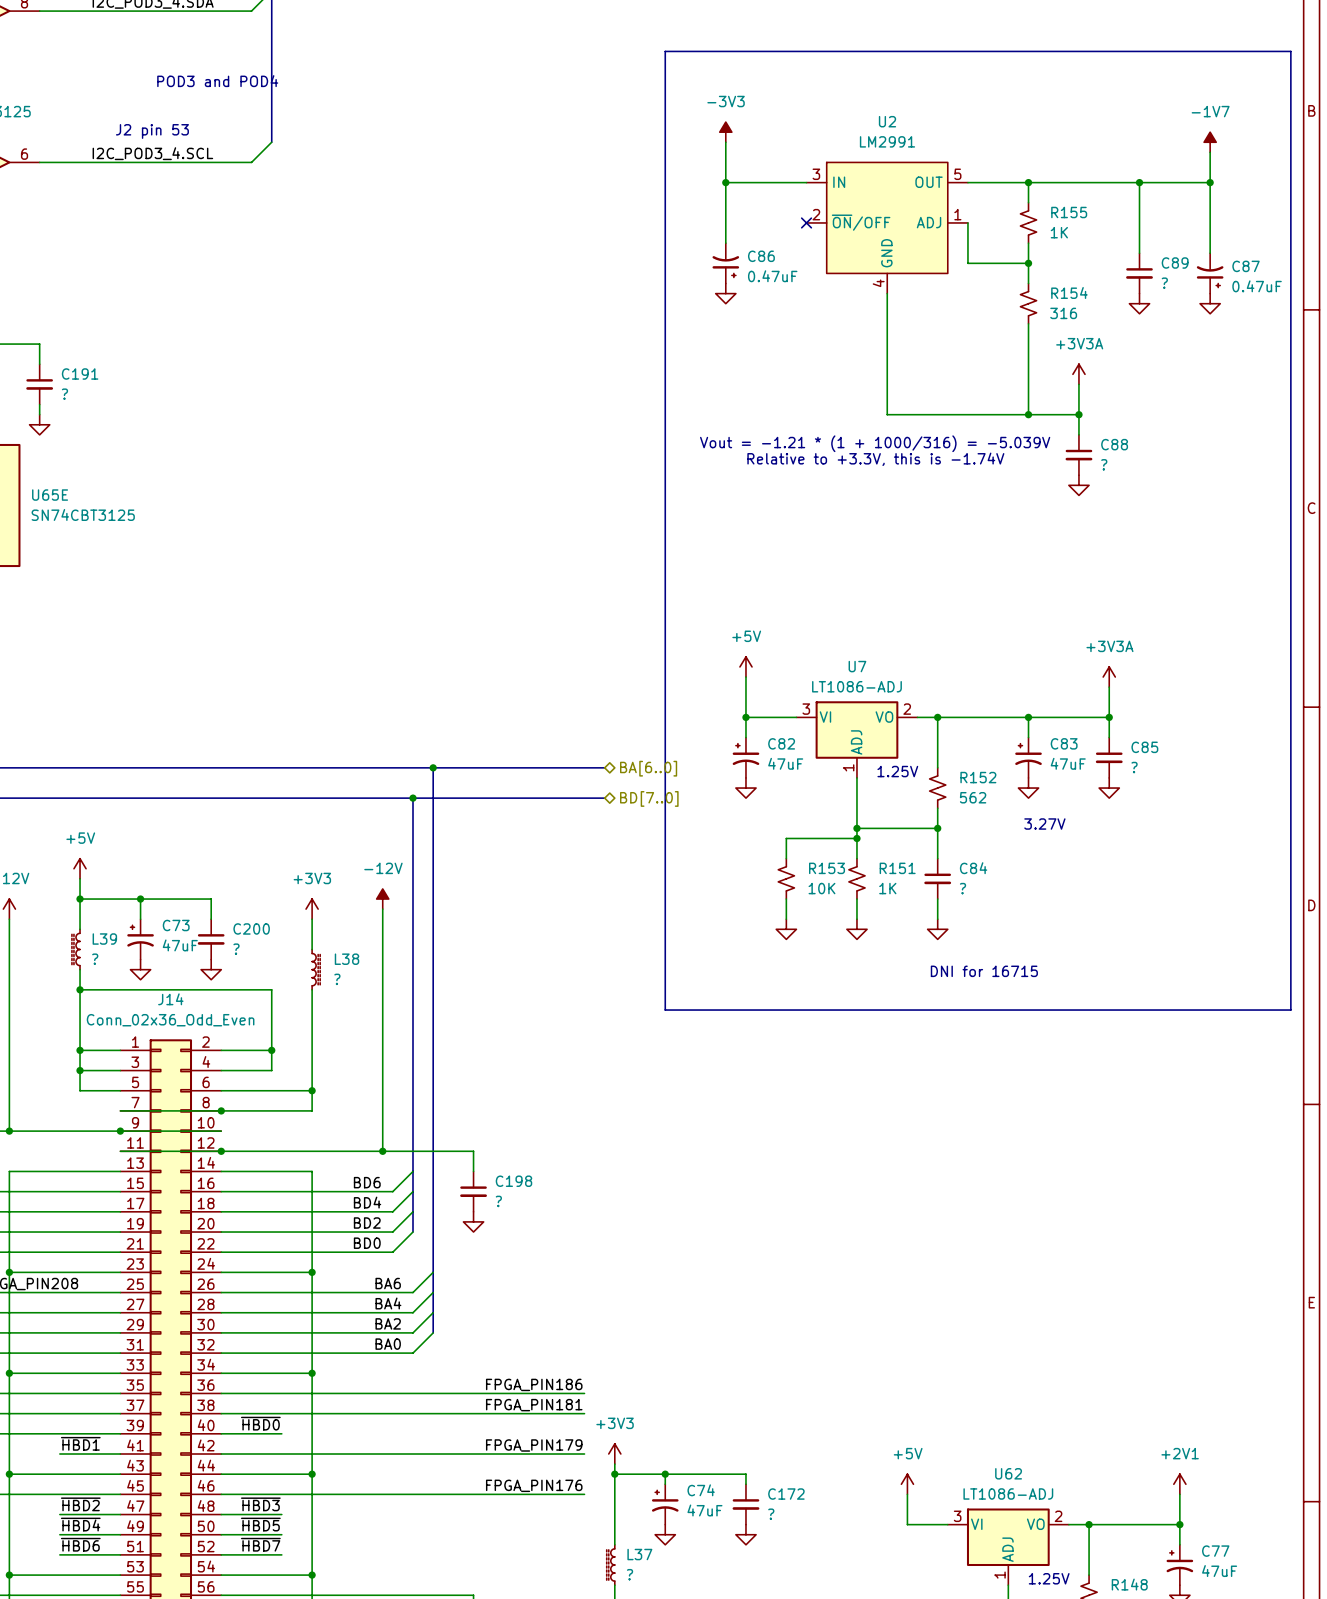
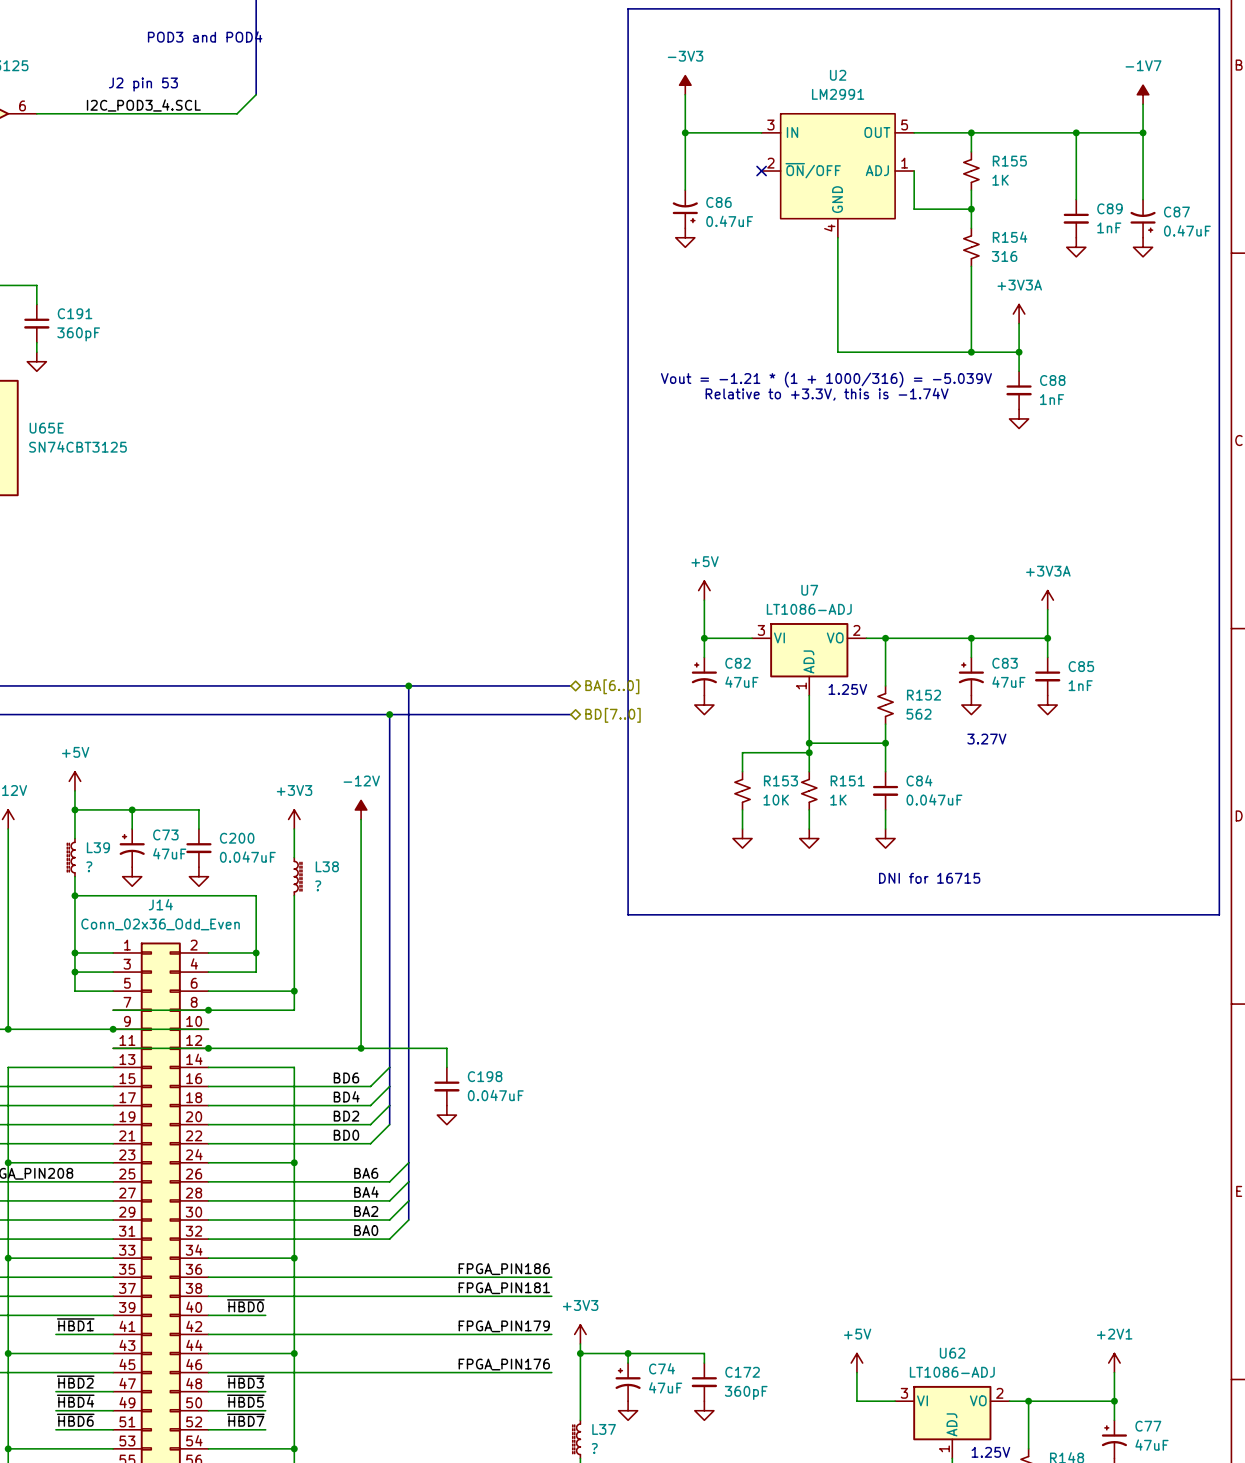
C89 value: ? (1164, 283) -> 1nF (1109, 227)
C191 value: ? (64, 394) -> 360pF (78, 334)
C88 value: ? (1104, 464) -> 1nF (1052, 399)
C85 value: ? (1134, 767) -> 1nF (1080, 685)
C84 value: ? (963, 888) -> 0.047uF (934, 799)
C200 value: ? (236, 949) -> 0.047uF (247, 857)
C198 value: ? (498, 1201) -> 0.047uF (495, 1095)
C172 value: ? (771, 1514) -> 360pF (746, 1392)

